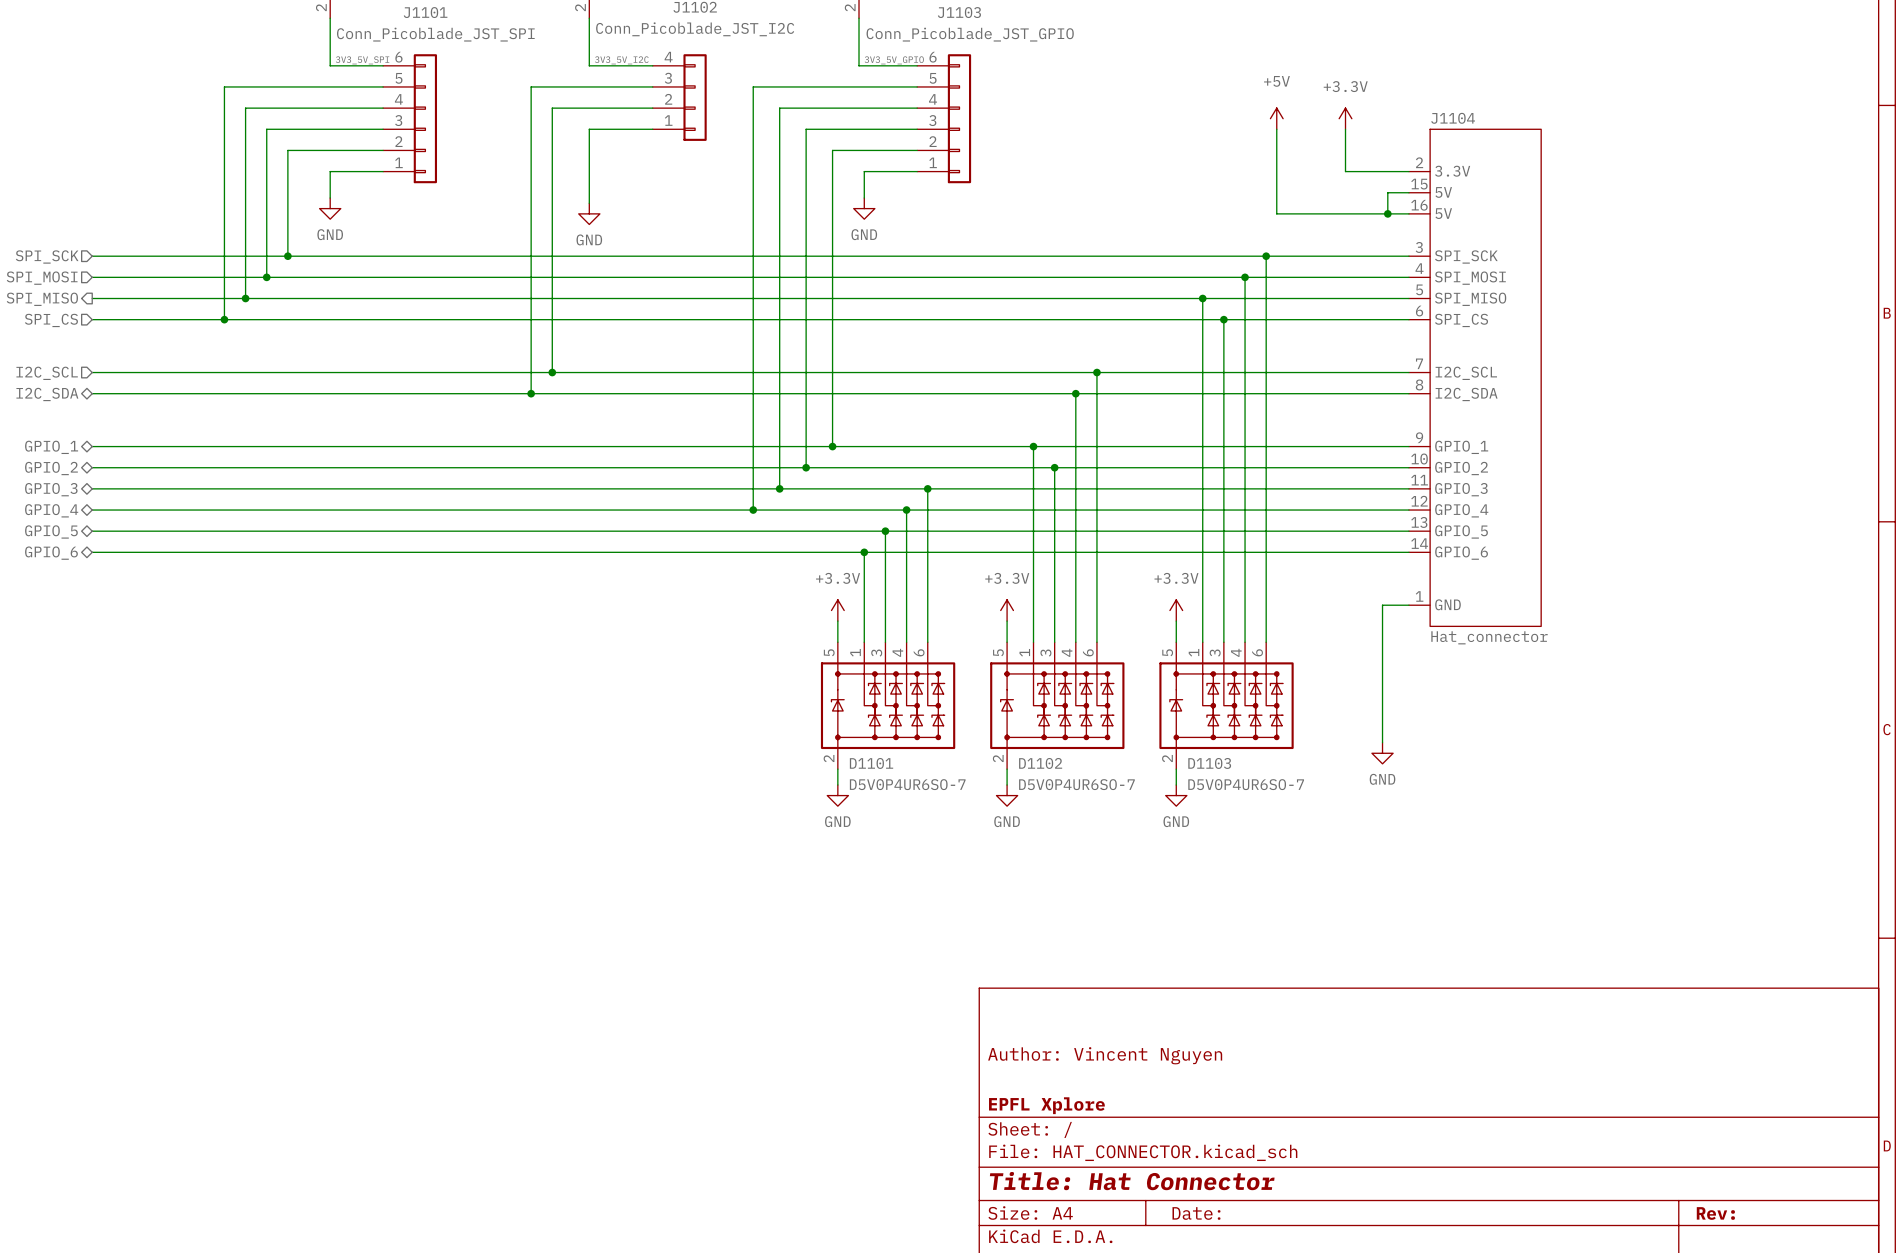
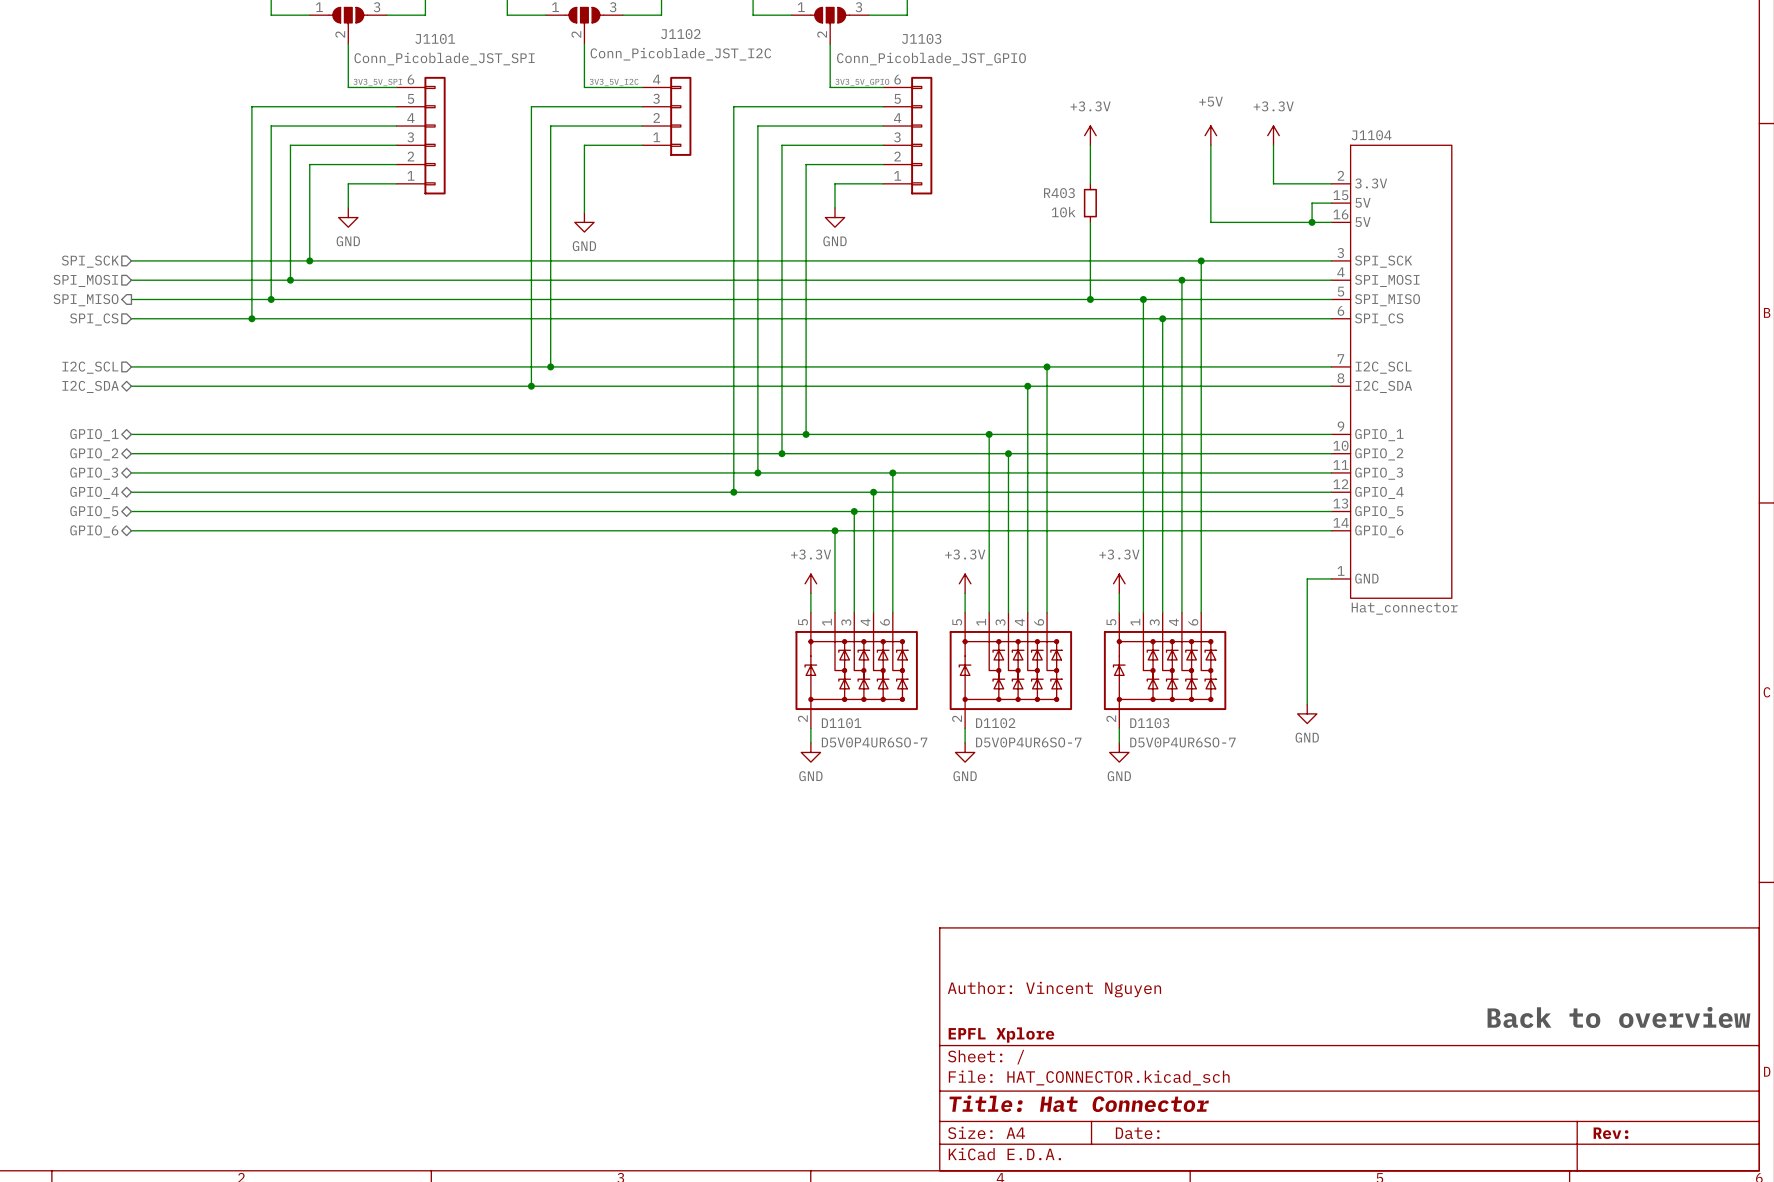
power symbol: none -> +3.3V (1090, 135)
wire: none -> (1090, 145) (1090, 183)
R403: none -> 10k (1090, 203)
wire: none -> (1090, 222) (1090, 299)
junction: none -> (1090, 299)
text: none -> Back to overview (1618, 1017)

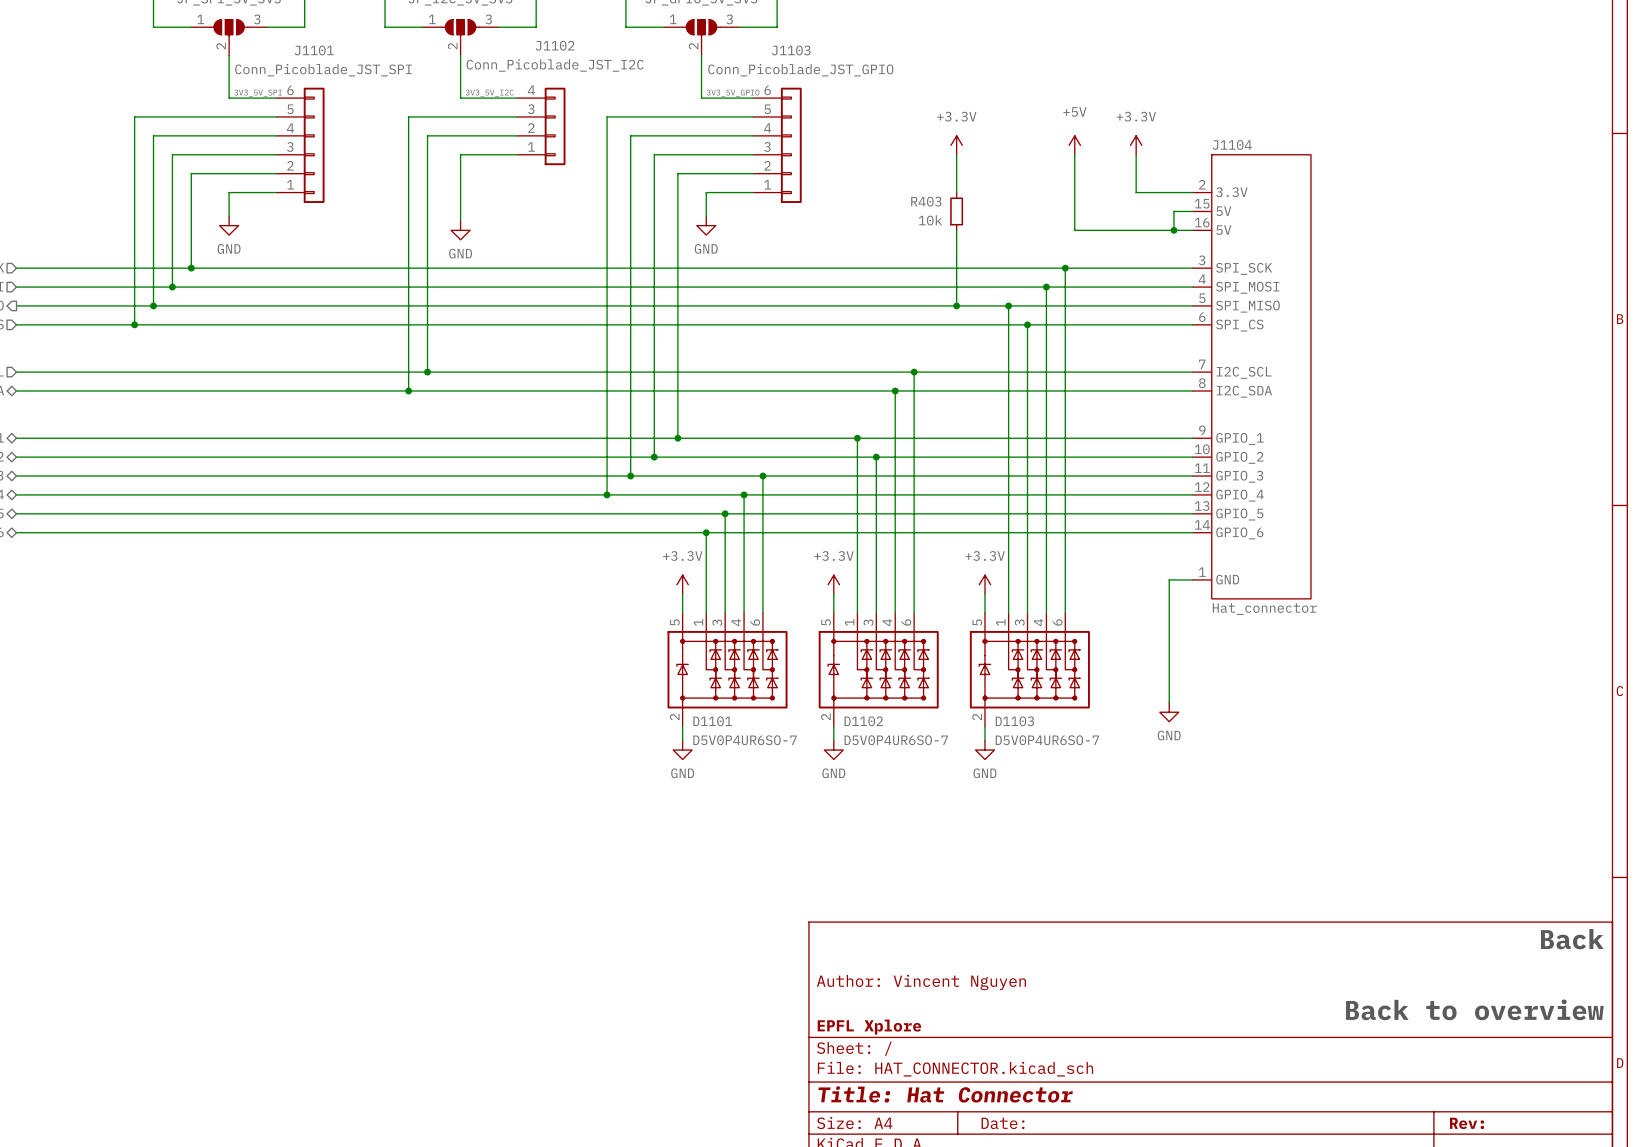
text: none -> Back (1572, 939)

